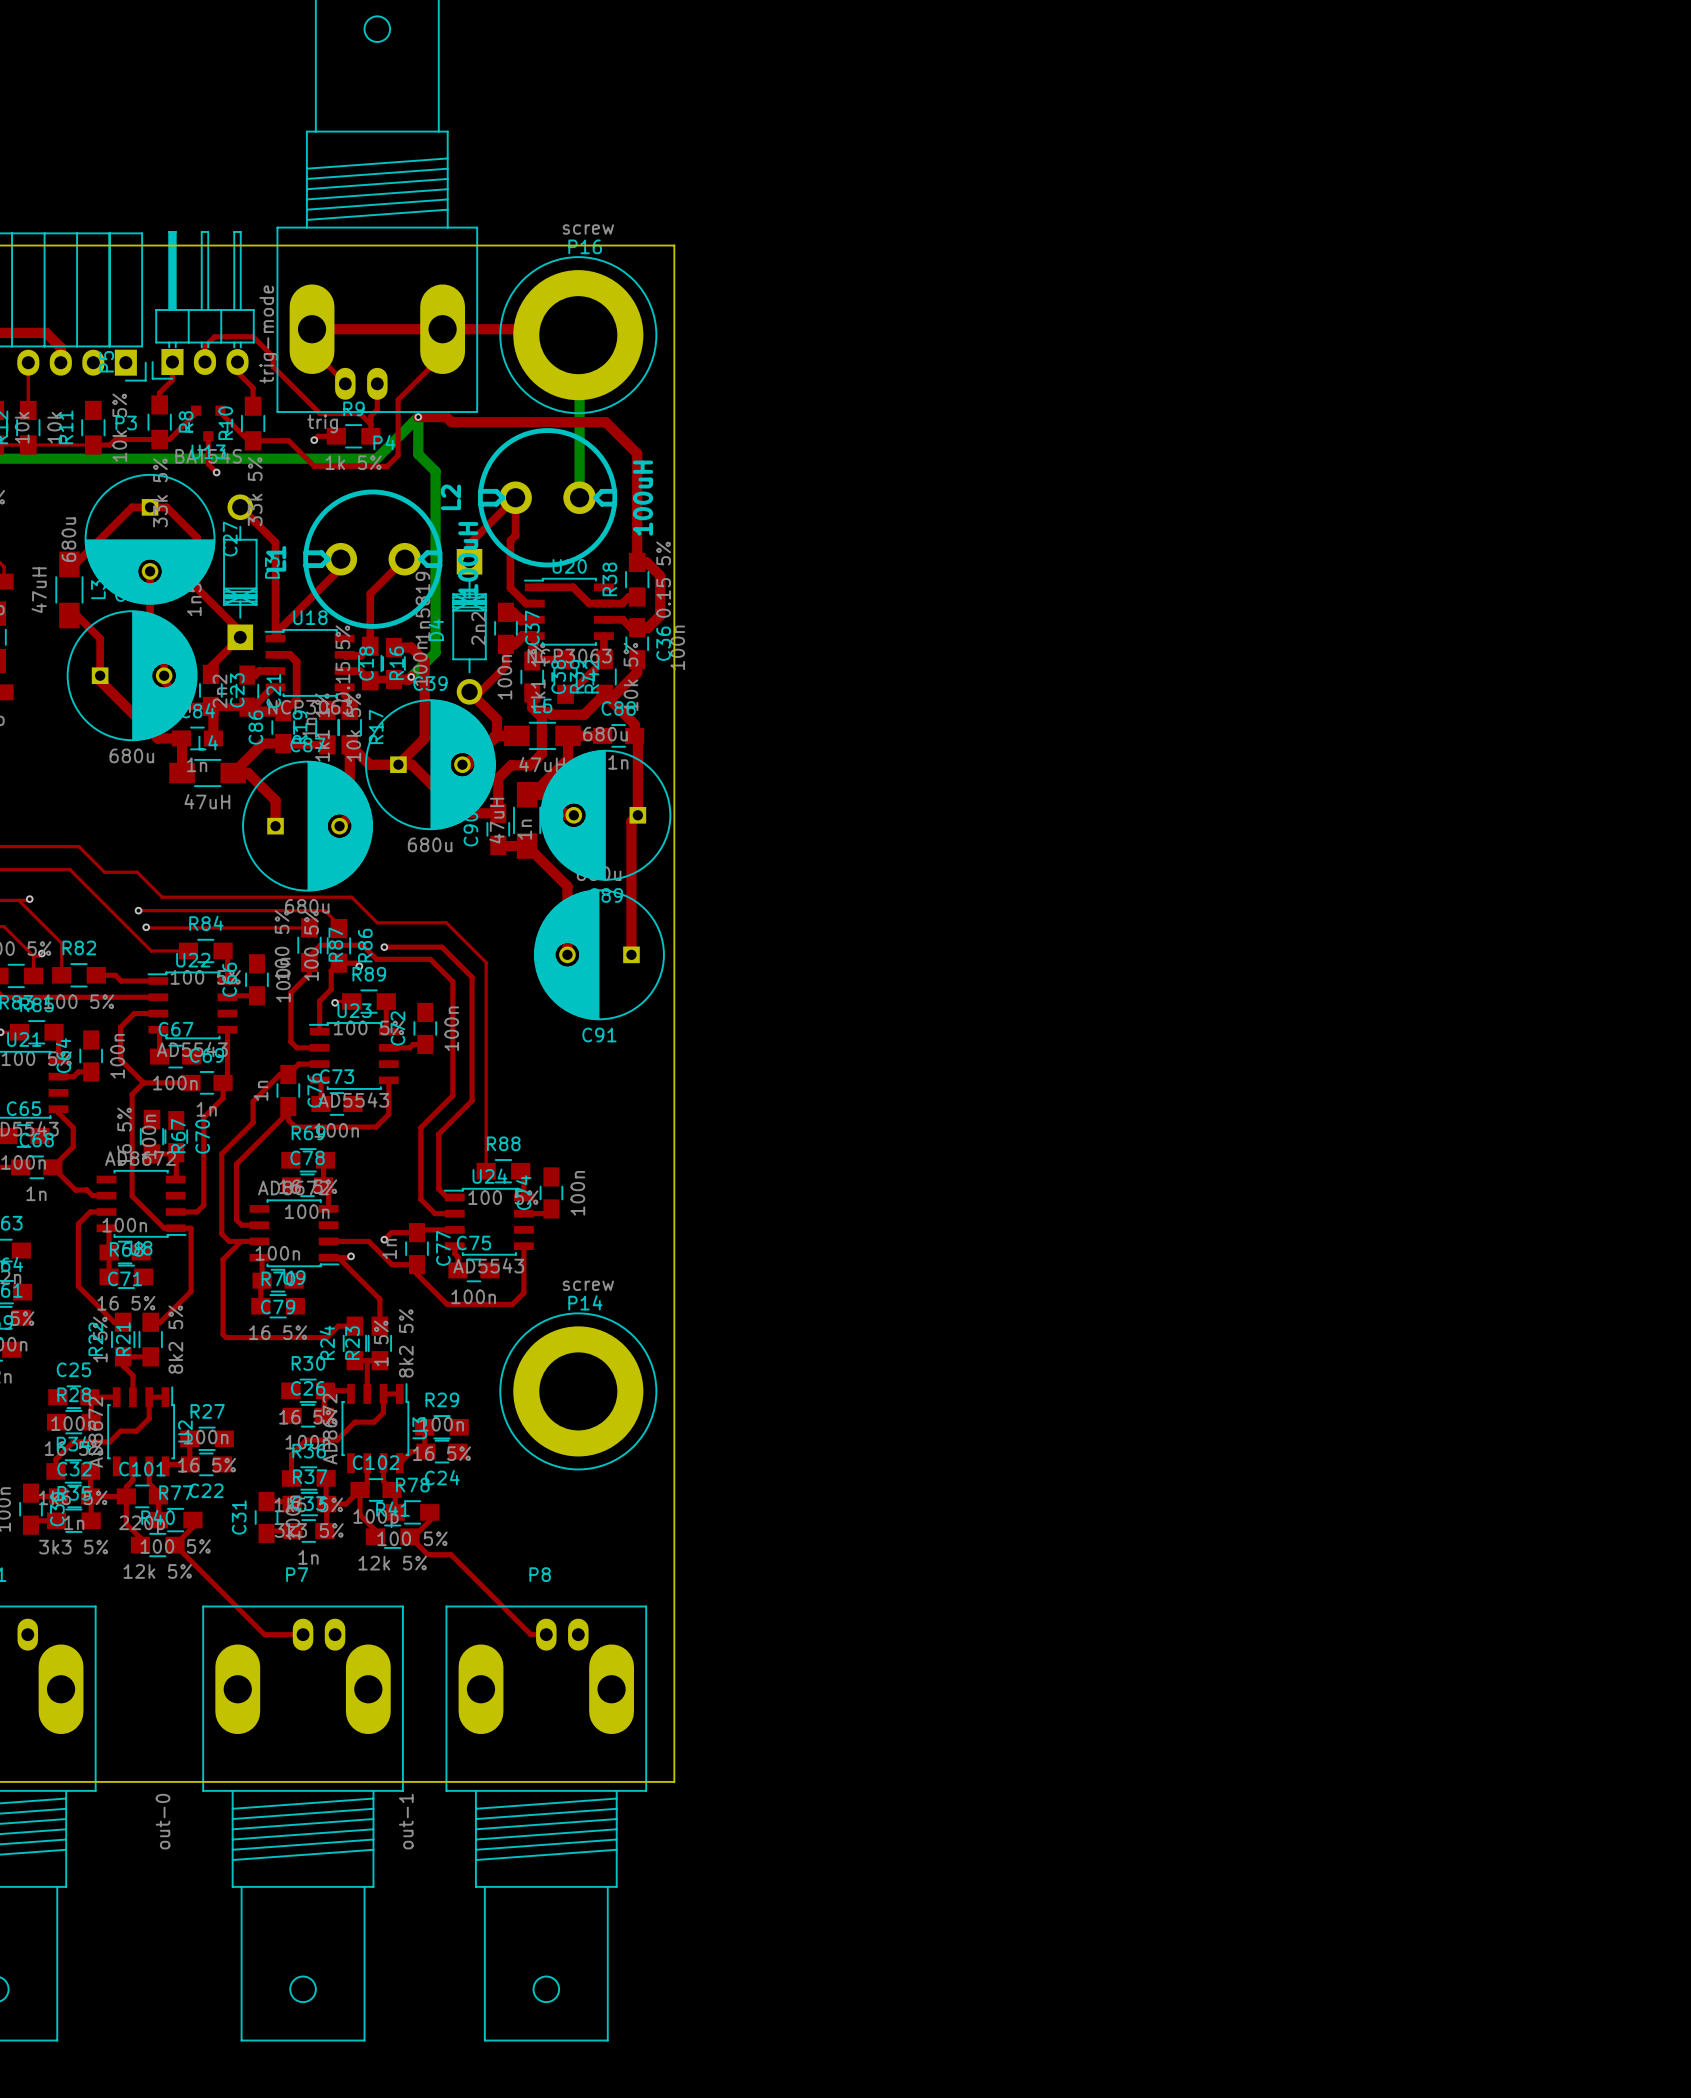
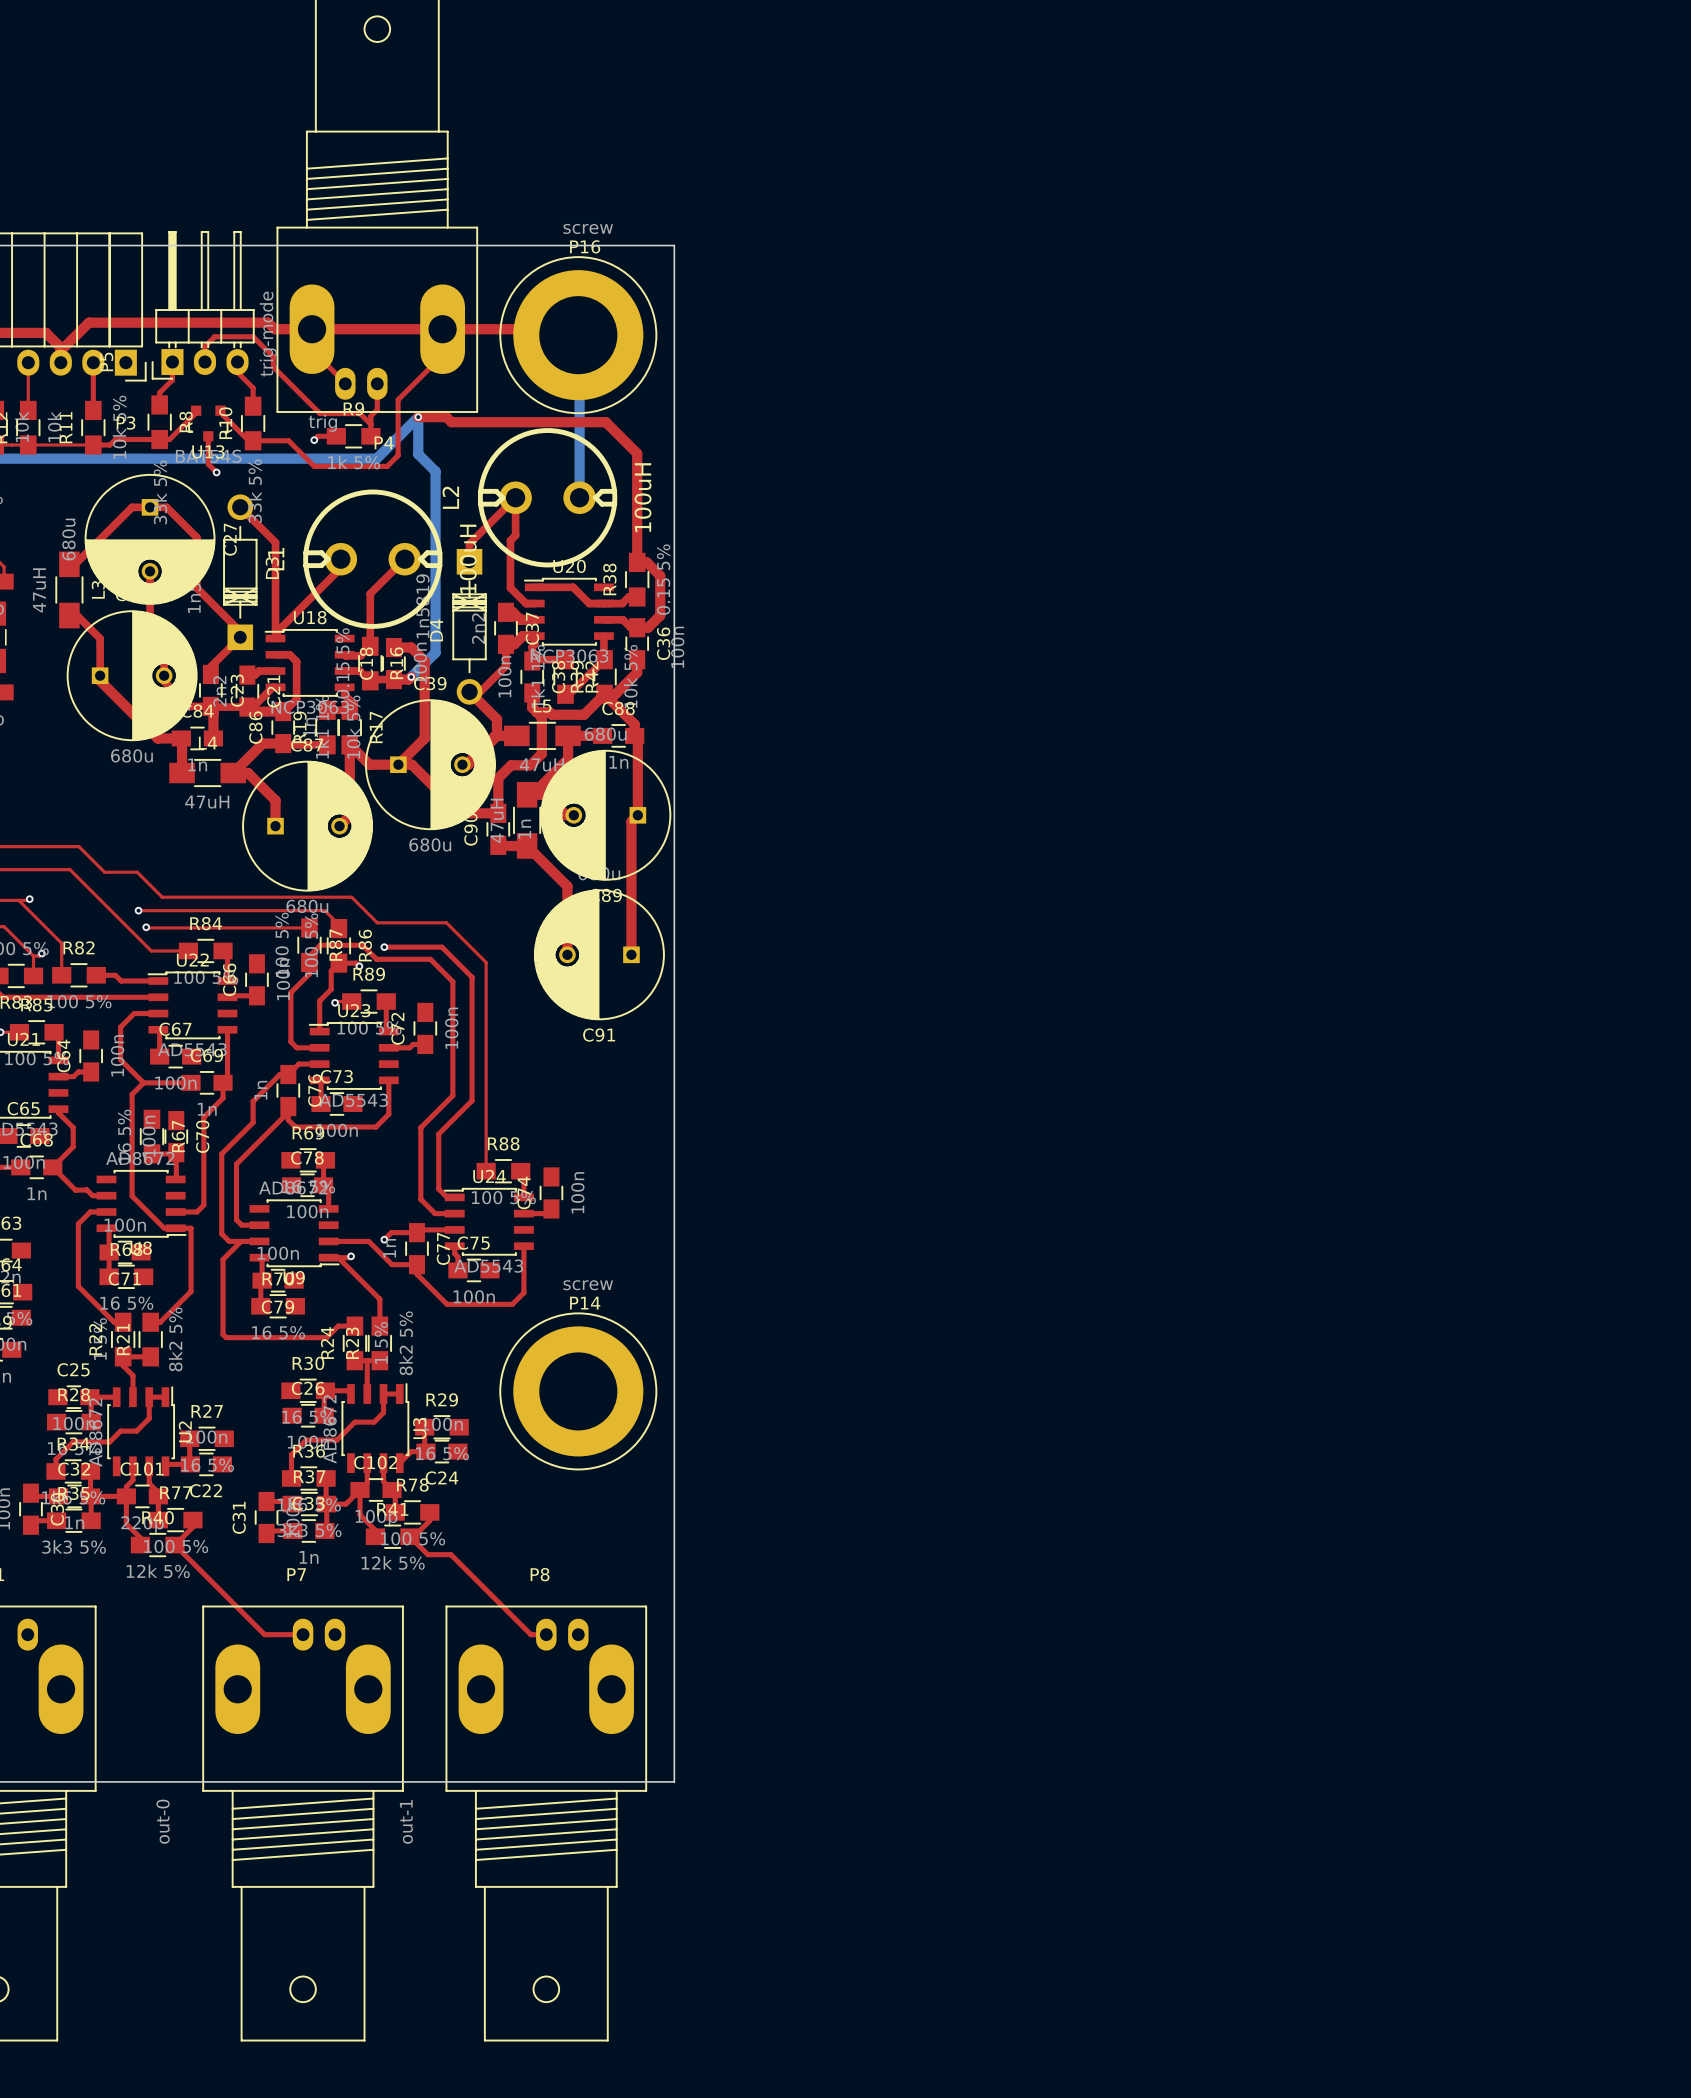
top track: none -> (312, 329) (274, 329) (268, 322) (88, 322) (60, 350)
top track: none -> (93, 362) (93, 410)

